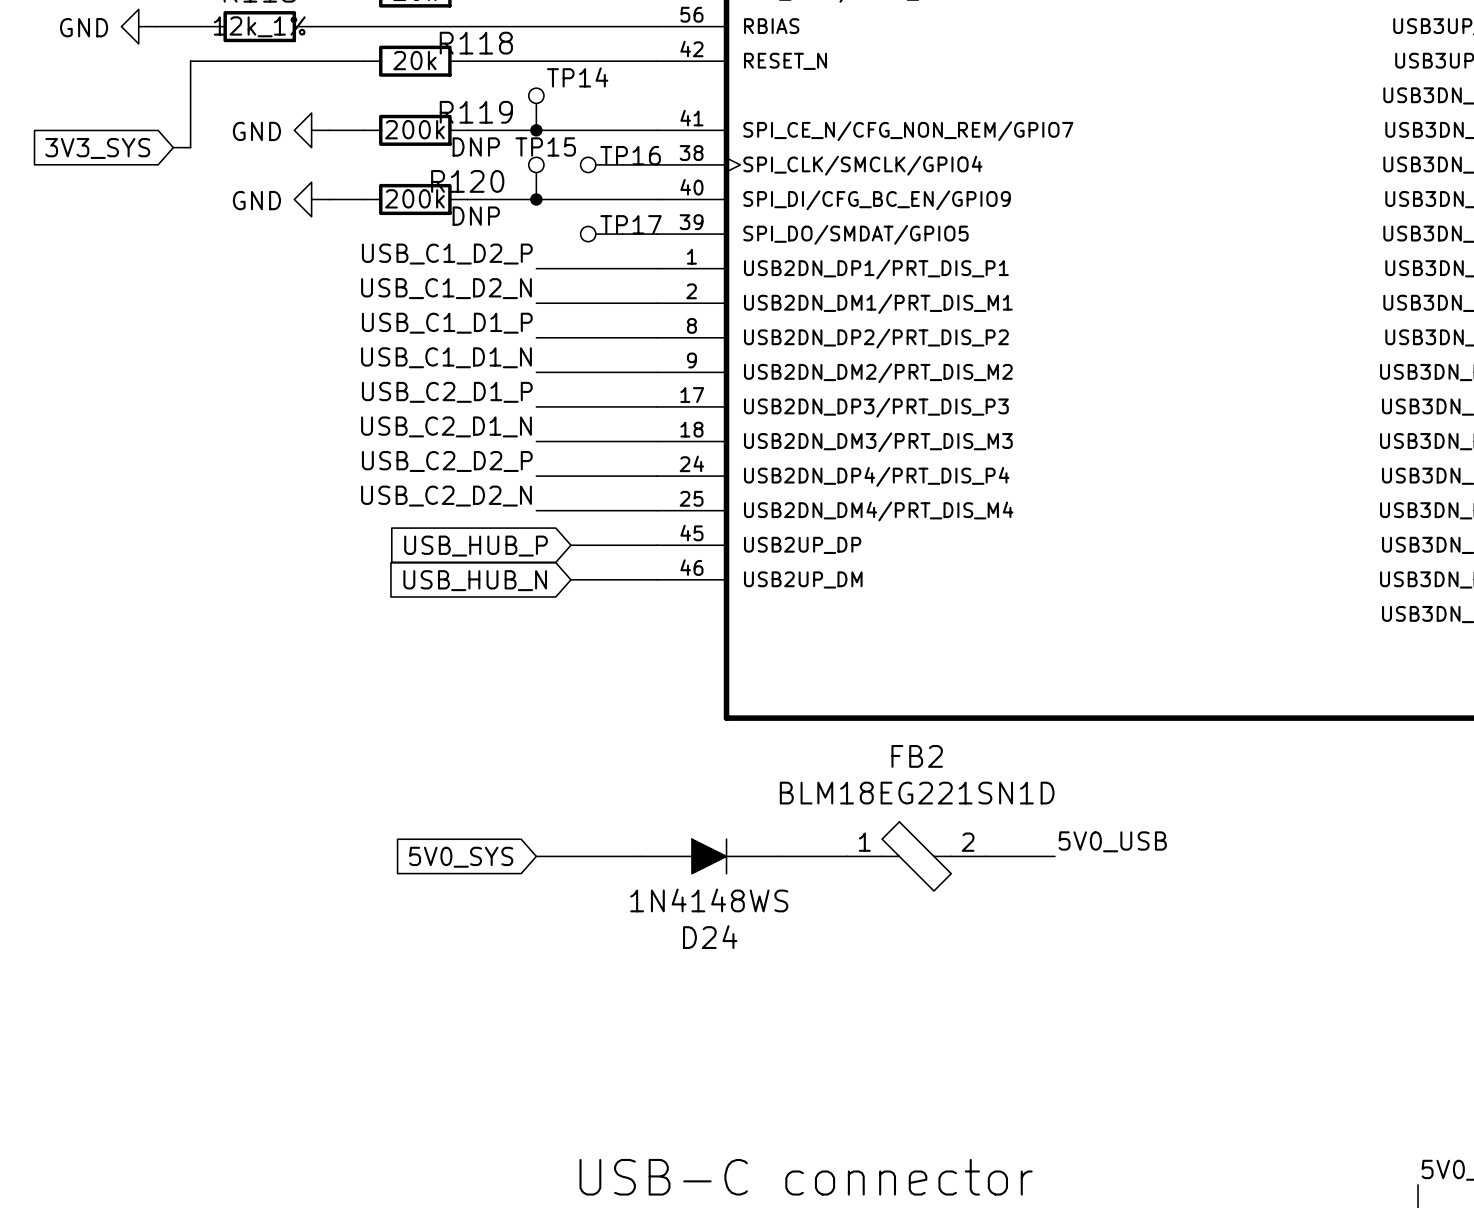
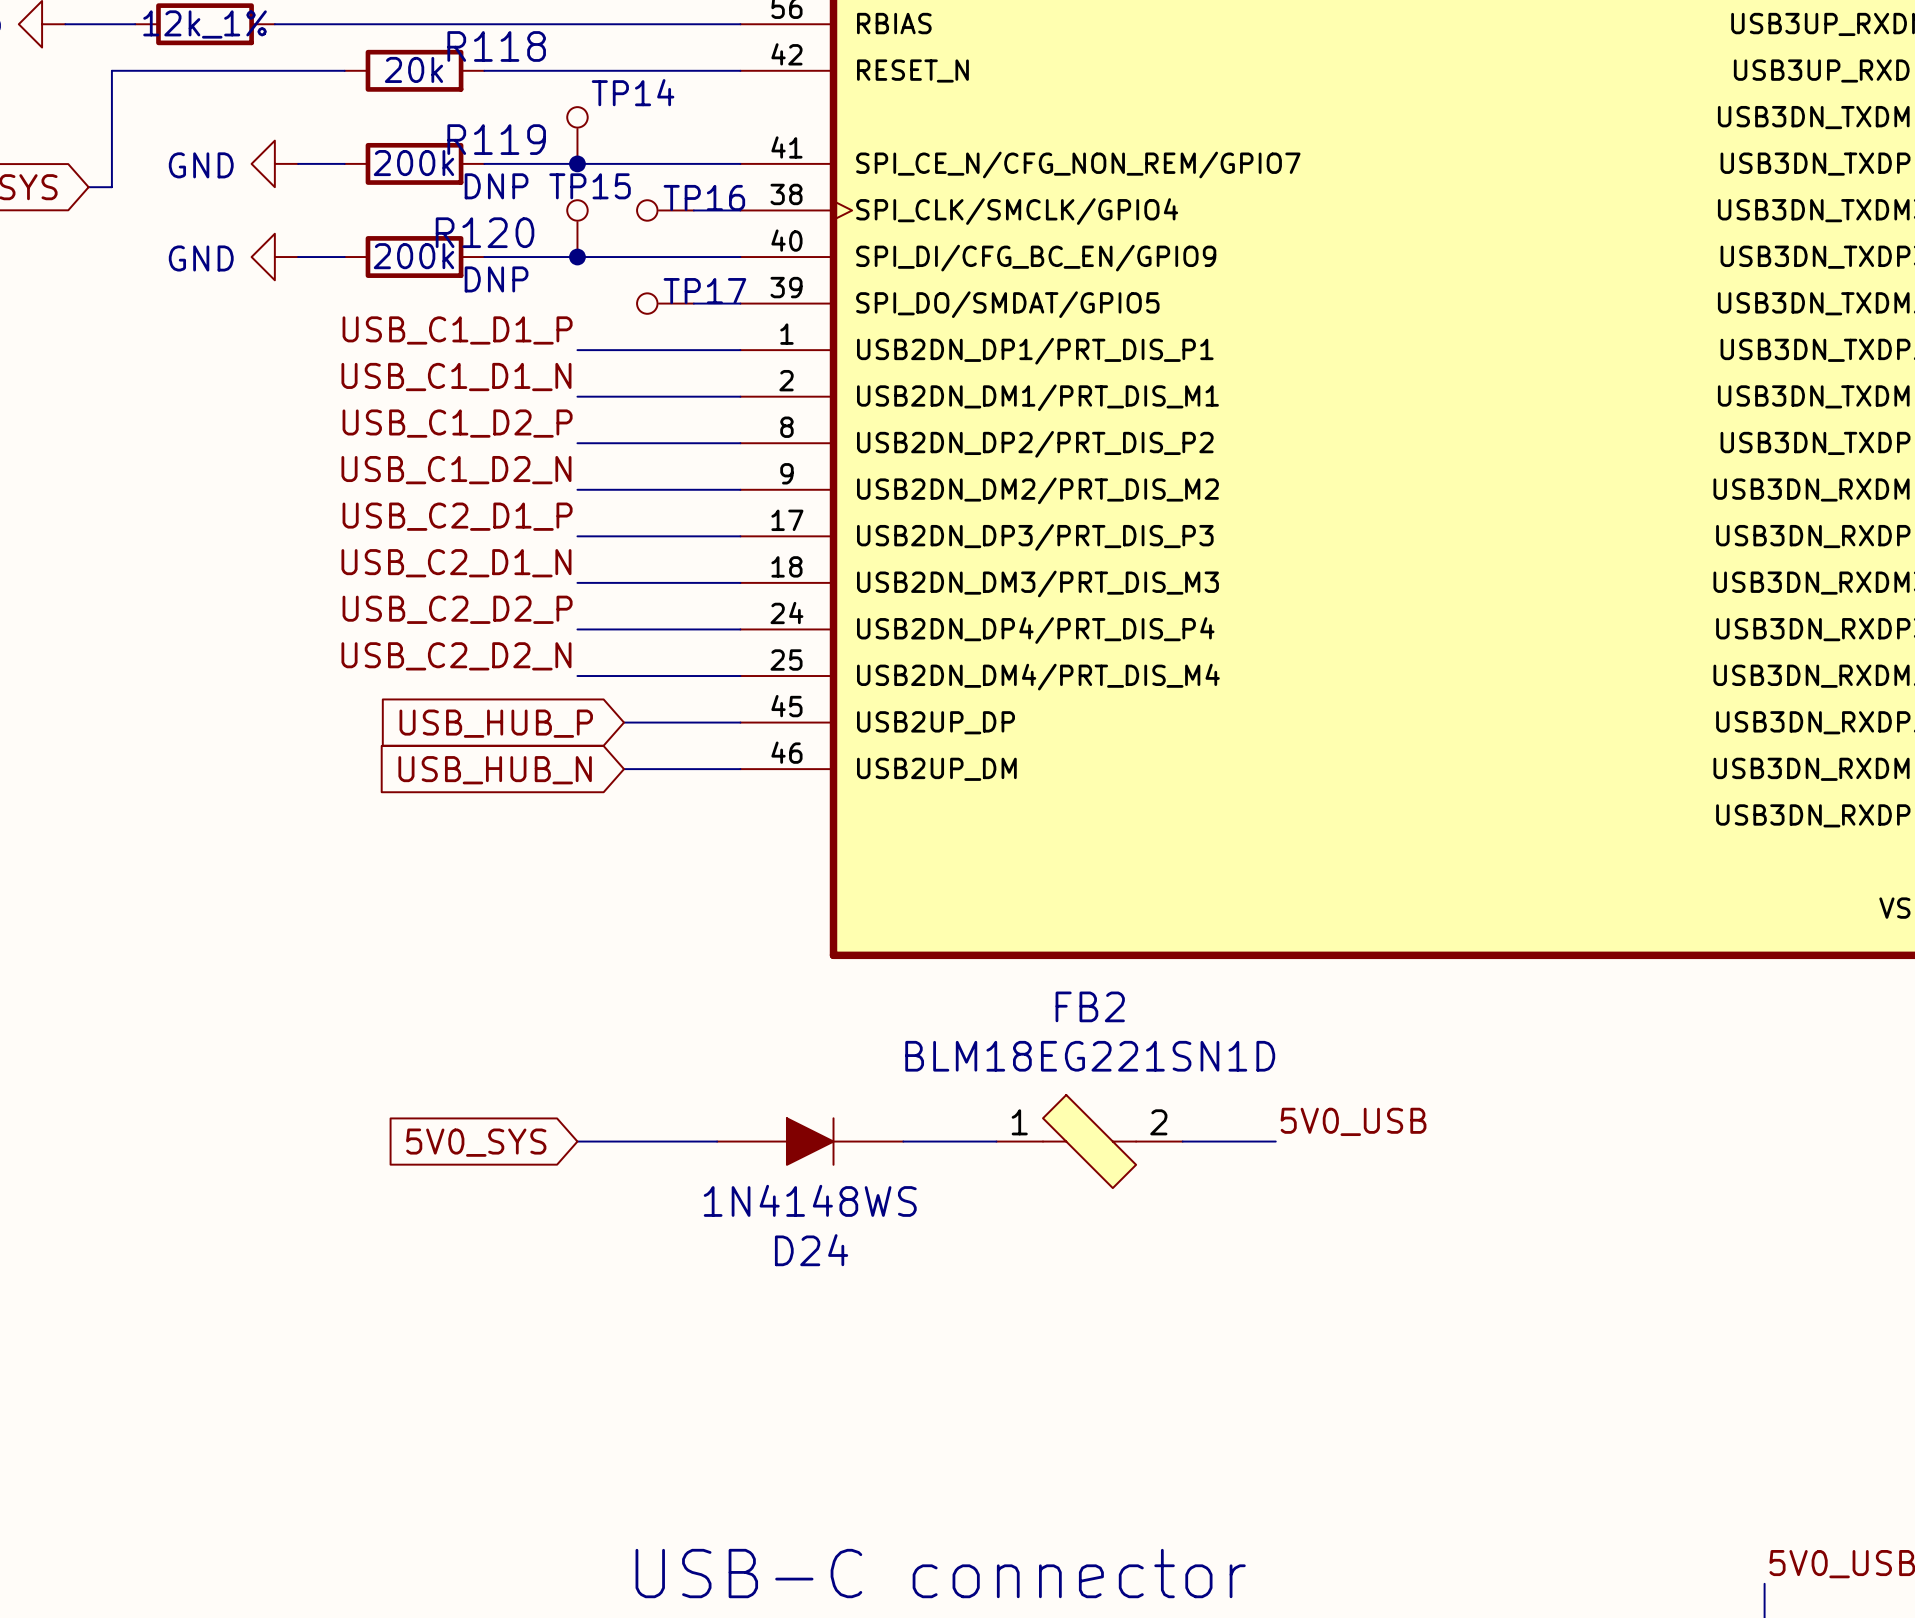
label: USB_C1_D2_P (447, 254) -> USB_C1_D1_P (457, 330)
label: USB_C1_D2_N (446, 288) -> USB_C1_D1_N (456, 377)
label: USB_C1_D1_P (447, 323) -> USB_C1_D2_P (457, 423)
label: USB_C1_D1_N (446, 357) -> USB_C1_D2_N (456, 470)

